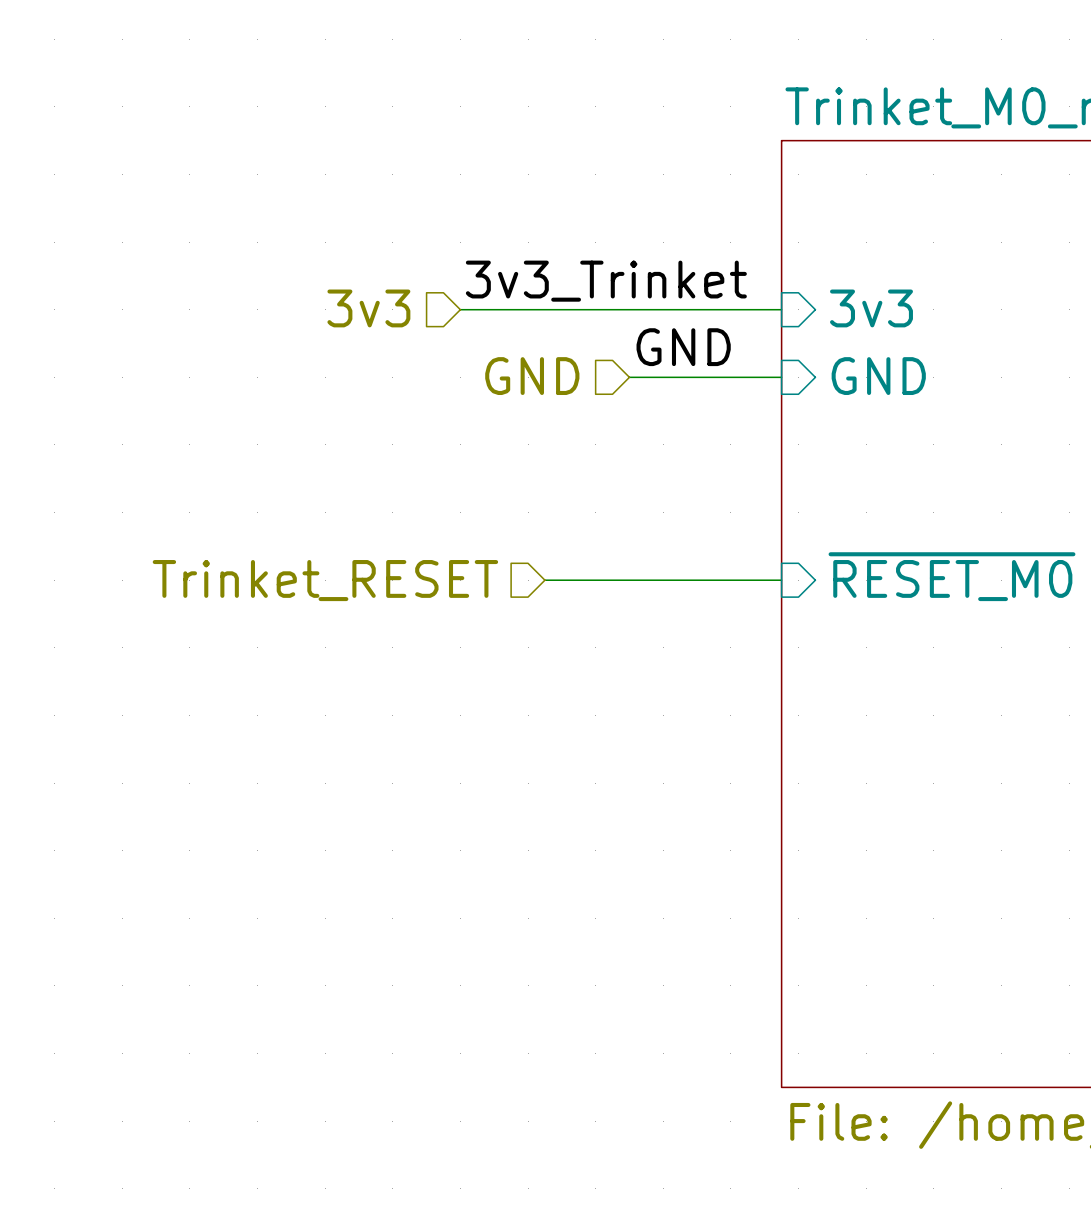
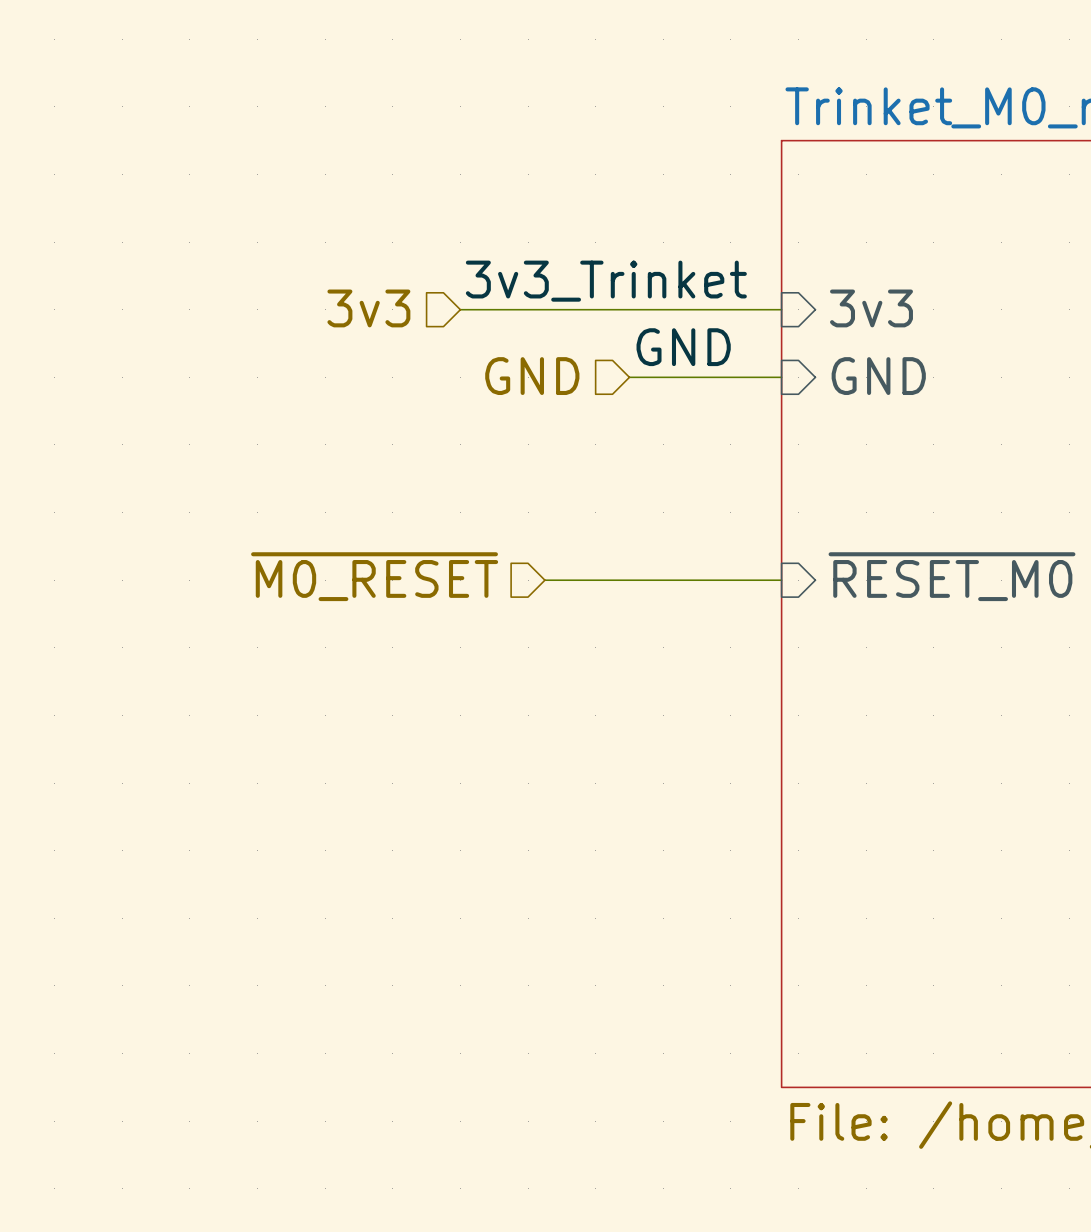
hierarchical label: Trinket_RESET (325, 580) -> ~{M0_RESET} (374, 576)

